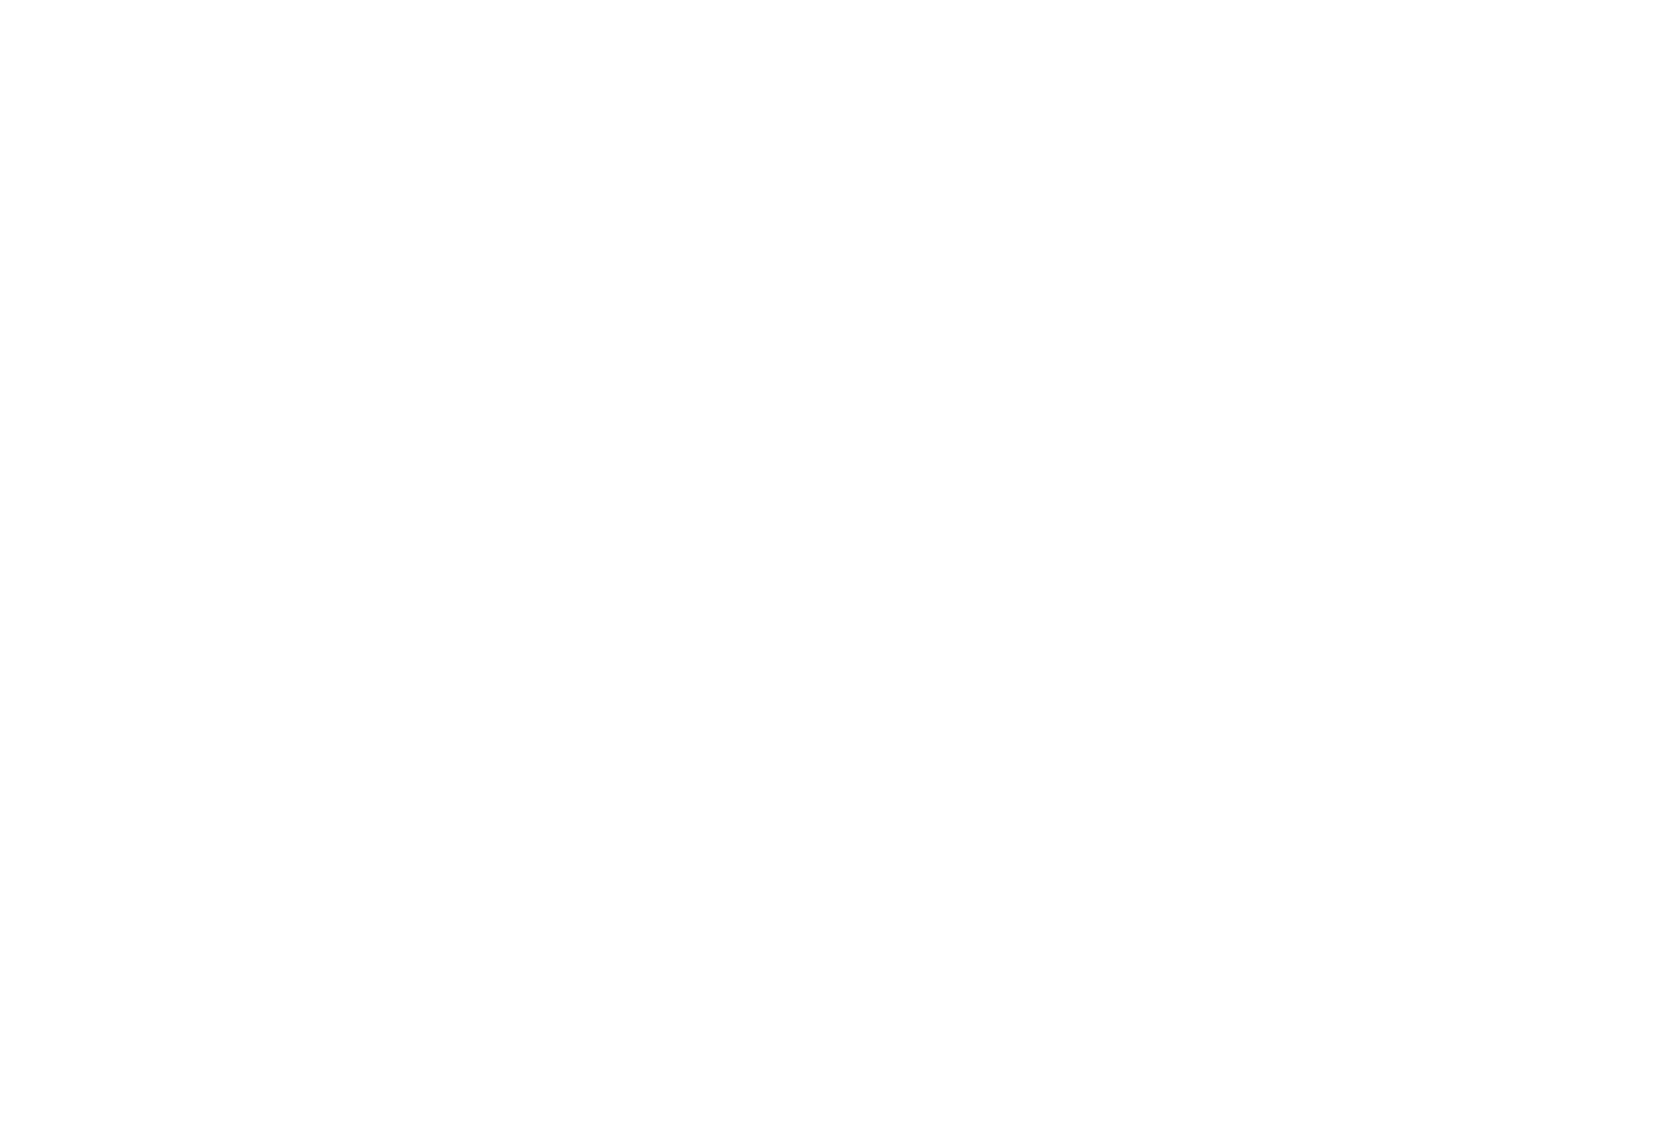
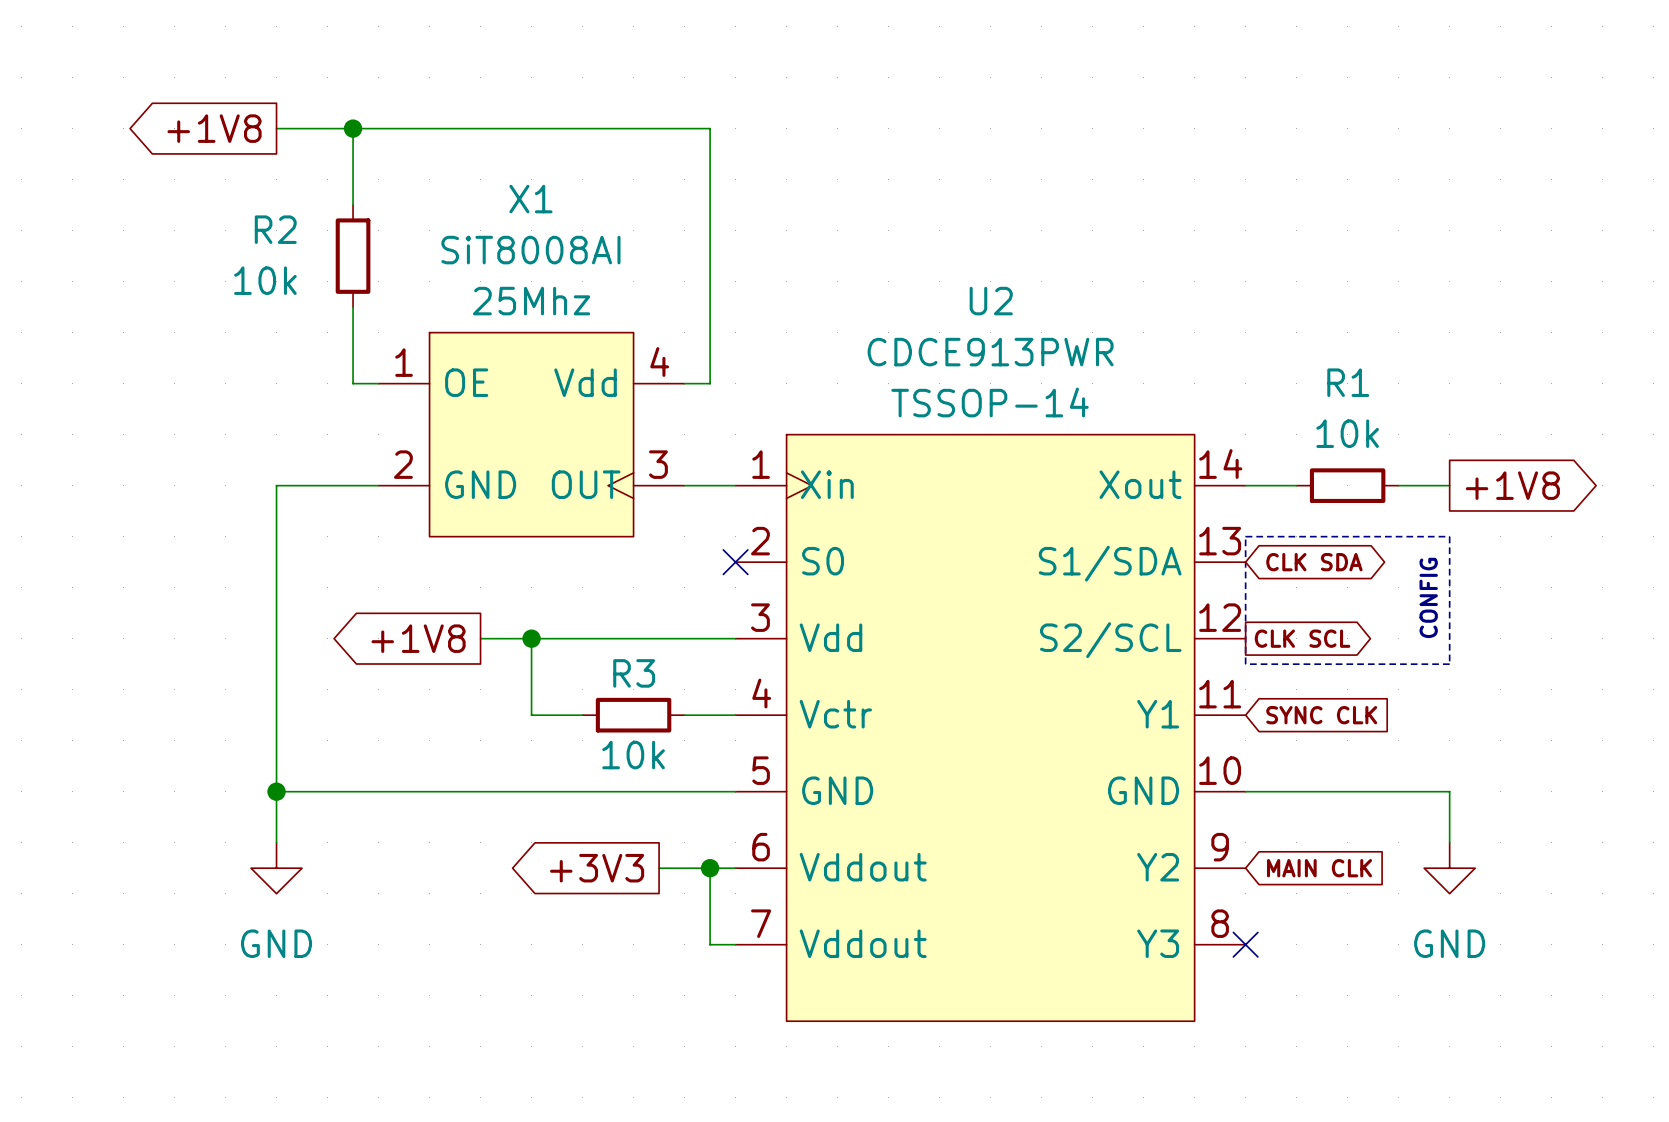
global label: none -> +1V8 (214, 128)
wire: none -> (276, 128) (710, 128) (710, 383) (684, 383)
wire: none -> (353, 128) (353, 205)
junction: none -> (353, 128)
R2: none -> 10k (353, 256)
wire: none -> (353, 307) (353, 383) (378, 383)
X1: none -> SiT8008AI (531, 434)
wire: none -> (378, 485) (276, 485) (276, 842)
wire: none -> (684, 485) (735, 485)
wire: none -> (1245, 485) (1296, 485)
R1: none -> 10k (1347, 485)
wire: none -> (1398, 485) (1449, 485)
global label: none -> +1V8 (1512, 485)
line: none -> (1245, 536) (1449, 536) (1449, 664) (1245, 664) (1245, 536)
no-connect mark: none -> (735, 562)
global label: none -> CLK SDA (1314, 562)
text: none -> CONFIG (1428, 597)
global label: none -> +1V8 (418, 638)
wire: none -> (480, 638) (735, 638)
wire: none -> (531, 638) (531, 715) (582, 715)
junction: none -> (531, 638)
global label: none -> CLK SCL (1302, 638)
R3: none -> 10k (633, 715)
wire: none -> (684, 715) (735, 715)
global label: none -> SYNC CLK (1321, 715)
U2: none -> CDCE913PWR (990, 727)
wire: none -> (276, 791) (735, 791)
junction: none -> (276, 791)
wire: none -> (1245, 791) (1449, 791) (1449, 842)
power symbol: none -> GND (276, 868)
global label: none -> +3V3 (597, 868)
wire: none -> (659, 868) (735, 868)
wire: none -> (710, 868) (710, 944) (735, 944)
junction: none -> (710, 868)
global label: none -> MAIN CLK (1319, 868)
power symbol: none -> GND (1449, 868)
no-connect mark: none -> (1245, 944)

